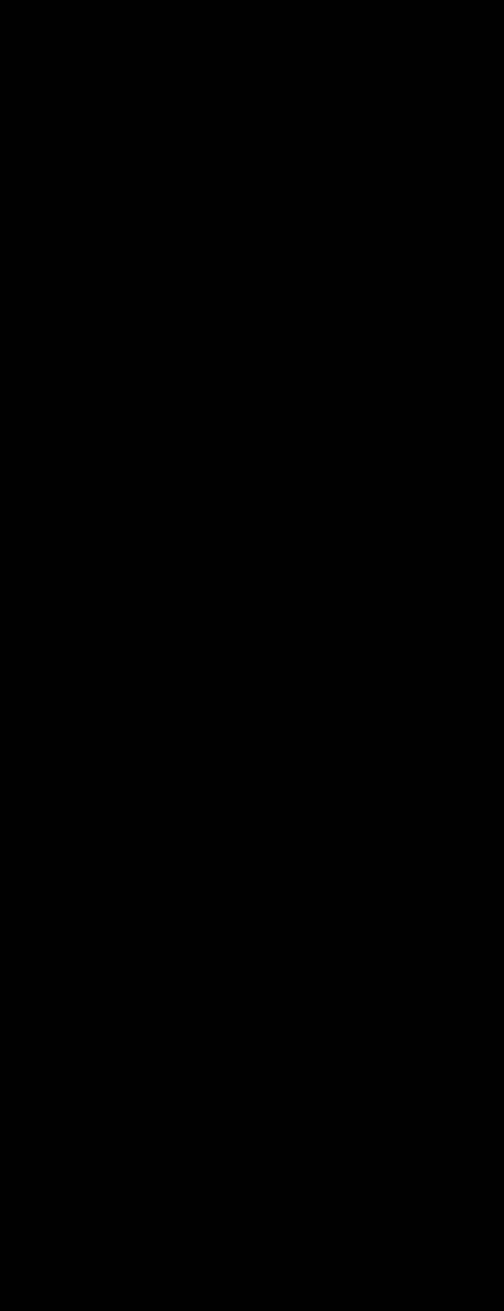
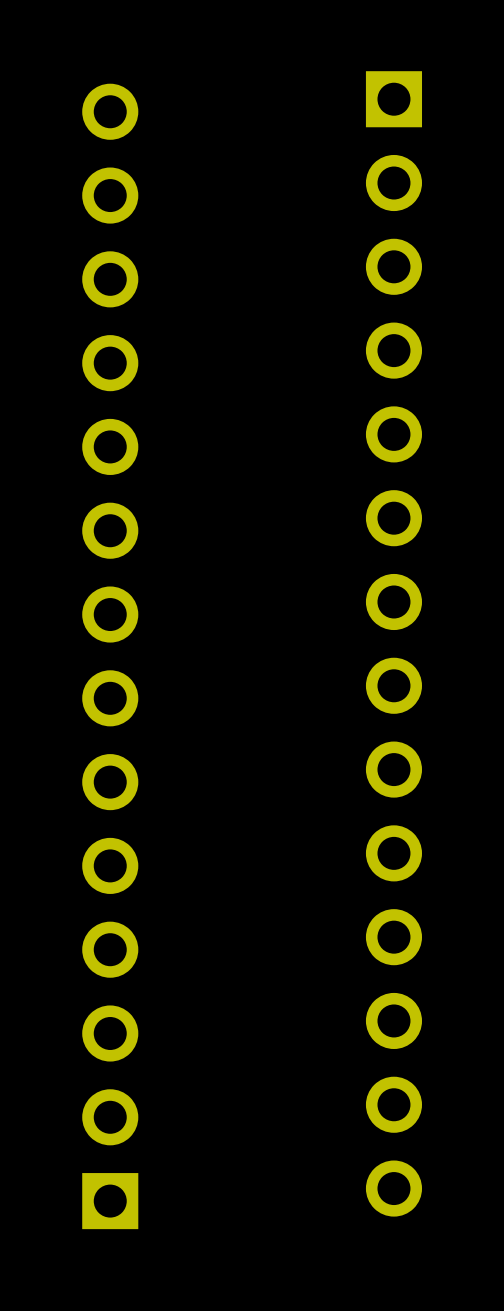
part: none -> (393, 643)
part: none -> (110, 656)

